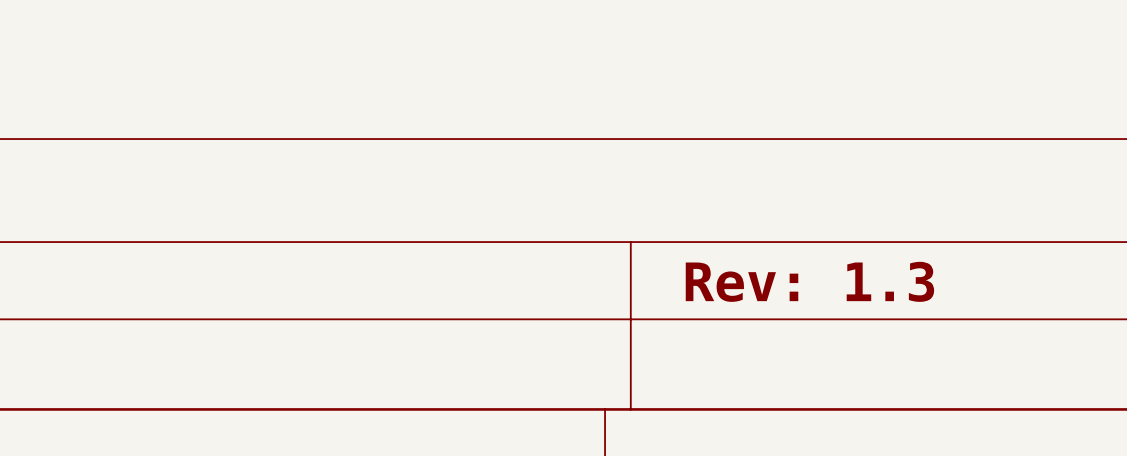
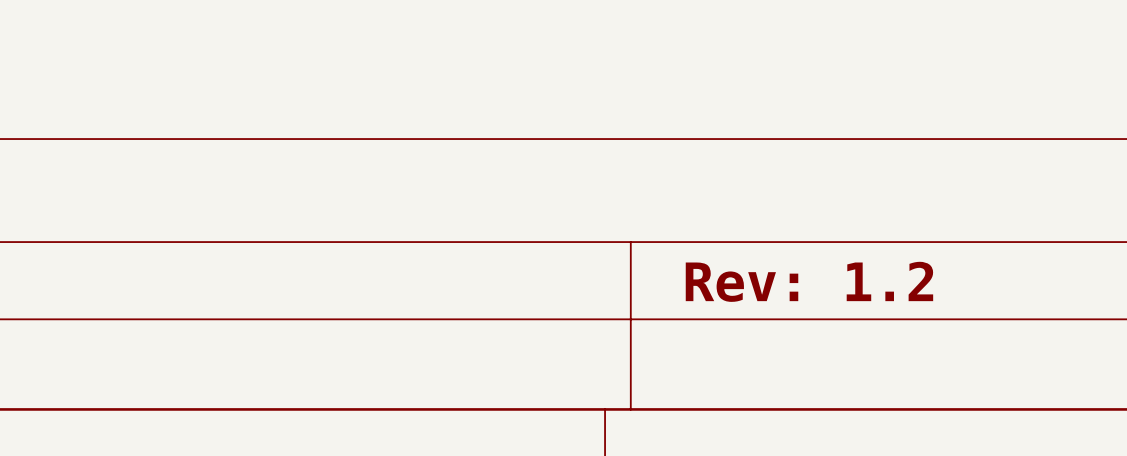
title block: Rev: 1.3 (809, 281) -> Rev: 1.2 (809, 281)

